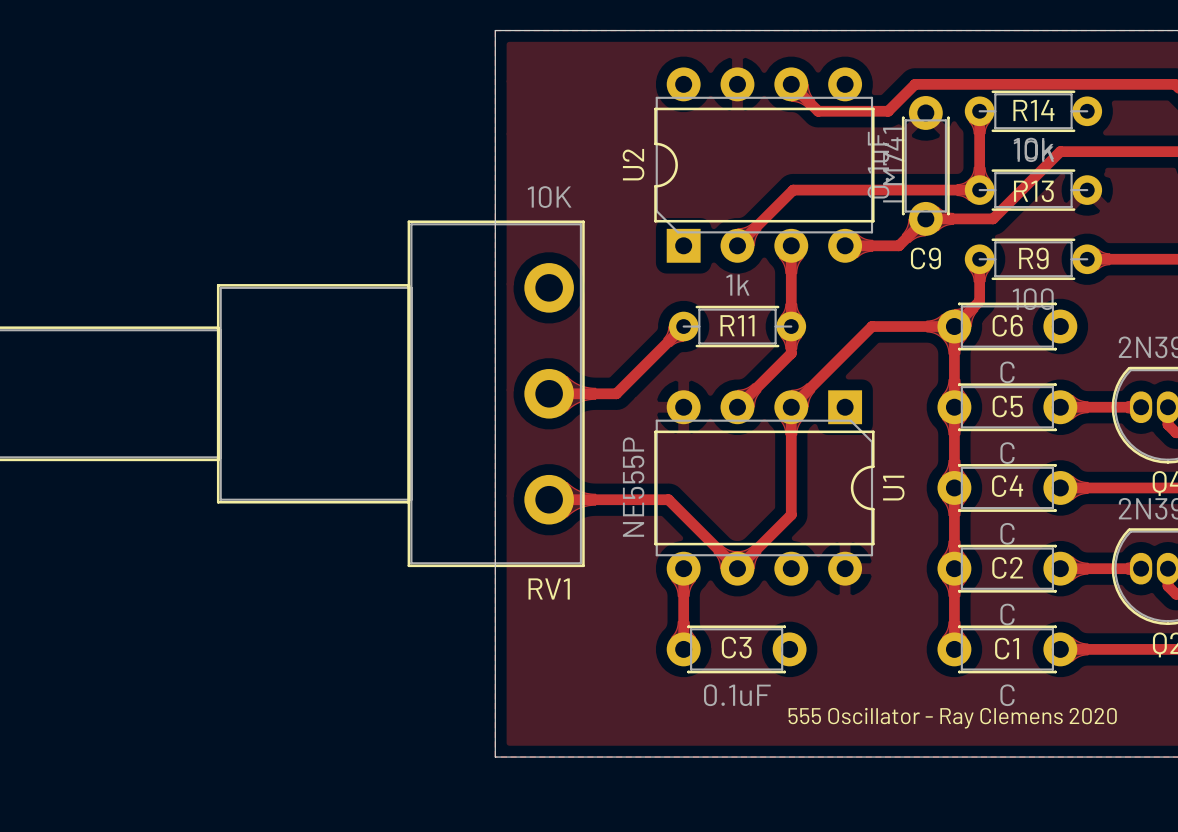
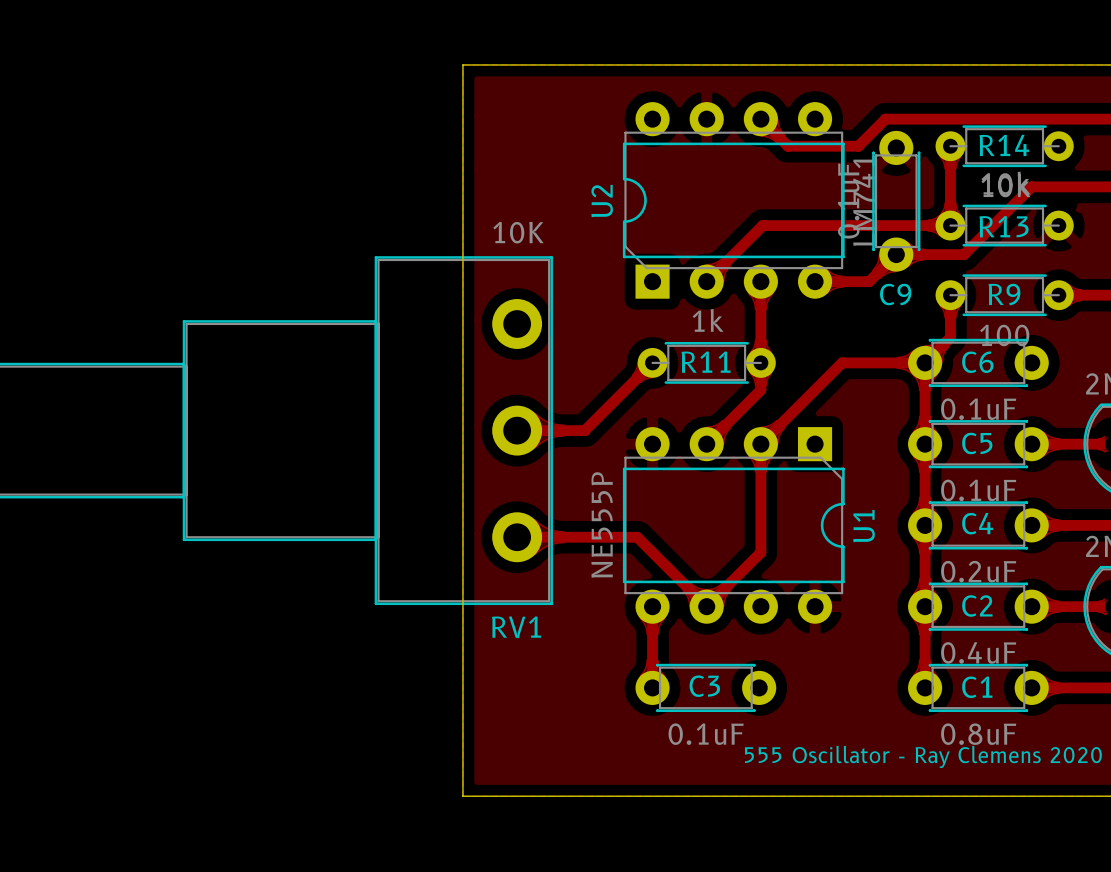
C6 value: C (1007, 372) -> 0.1uF (978, 409)
C5 value: C (1007, 453) -> 0.1uF (978, 490)
C4 value: C (1007, 533) -> 0.2uF (978, 571)
C2 value: C (1007, 614) -> 0.4uF (978, 652)
C1 value: C (1007, 695) -> 0.8uF (978, 734)

